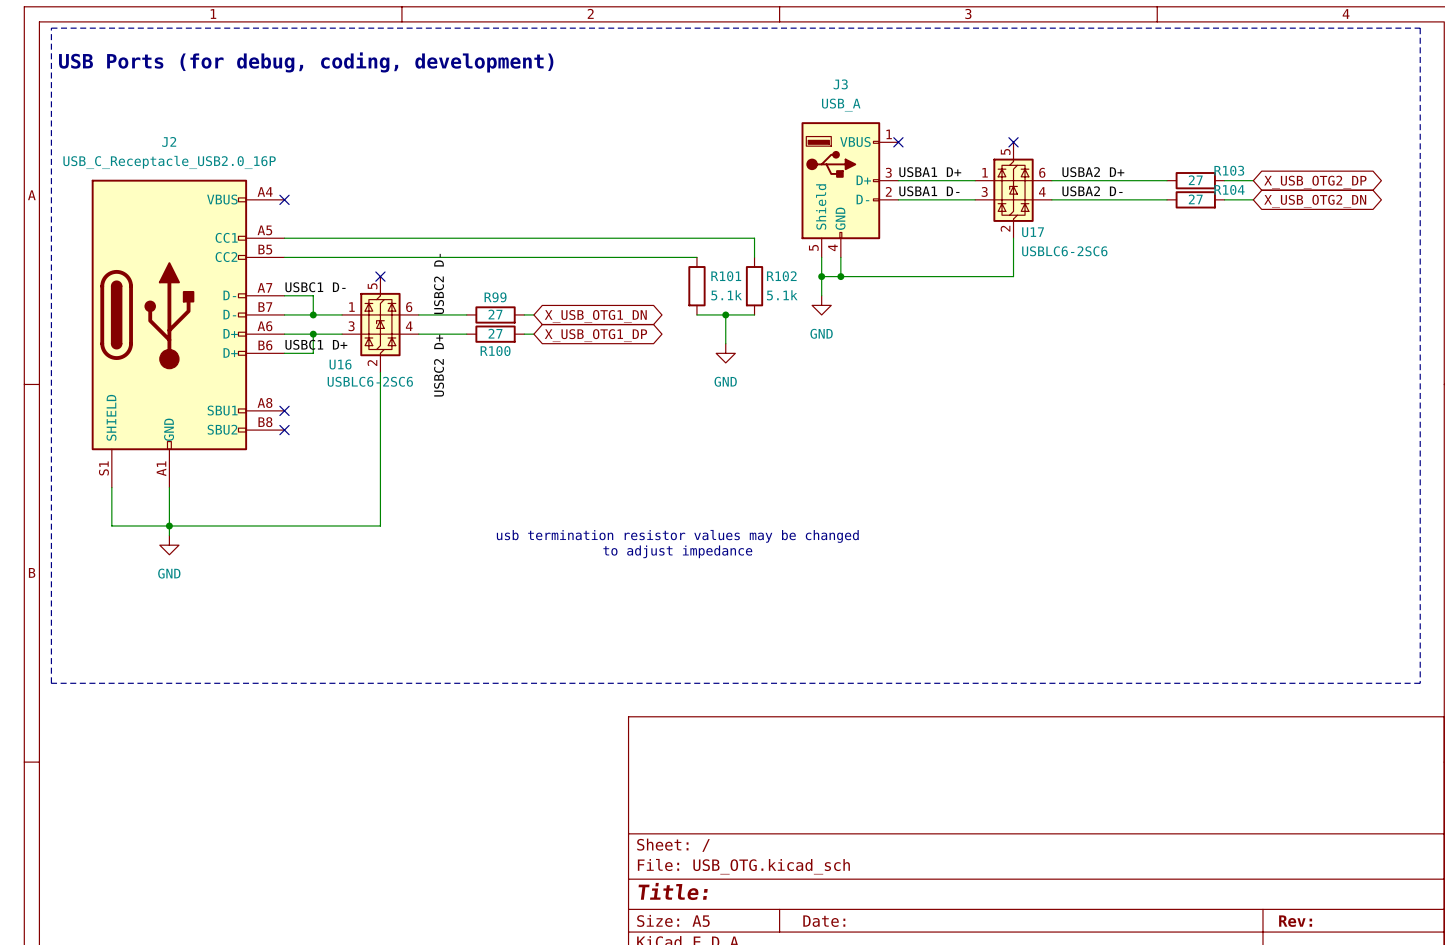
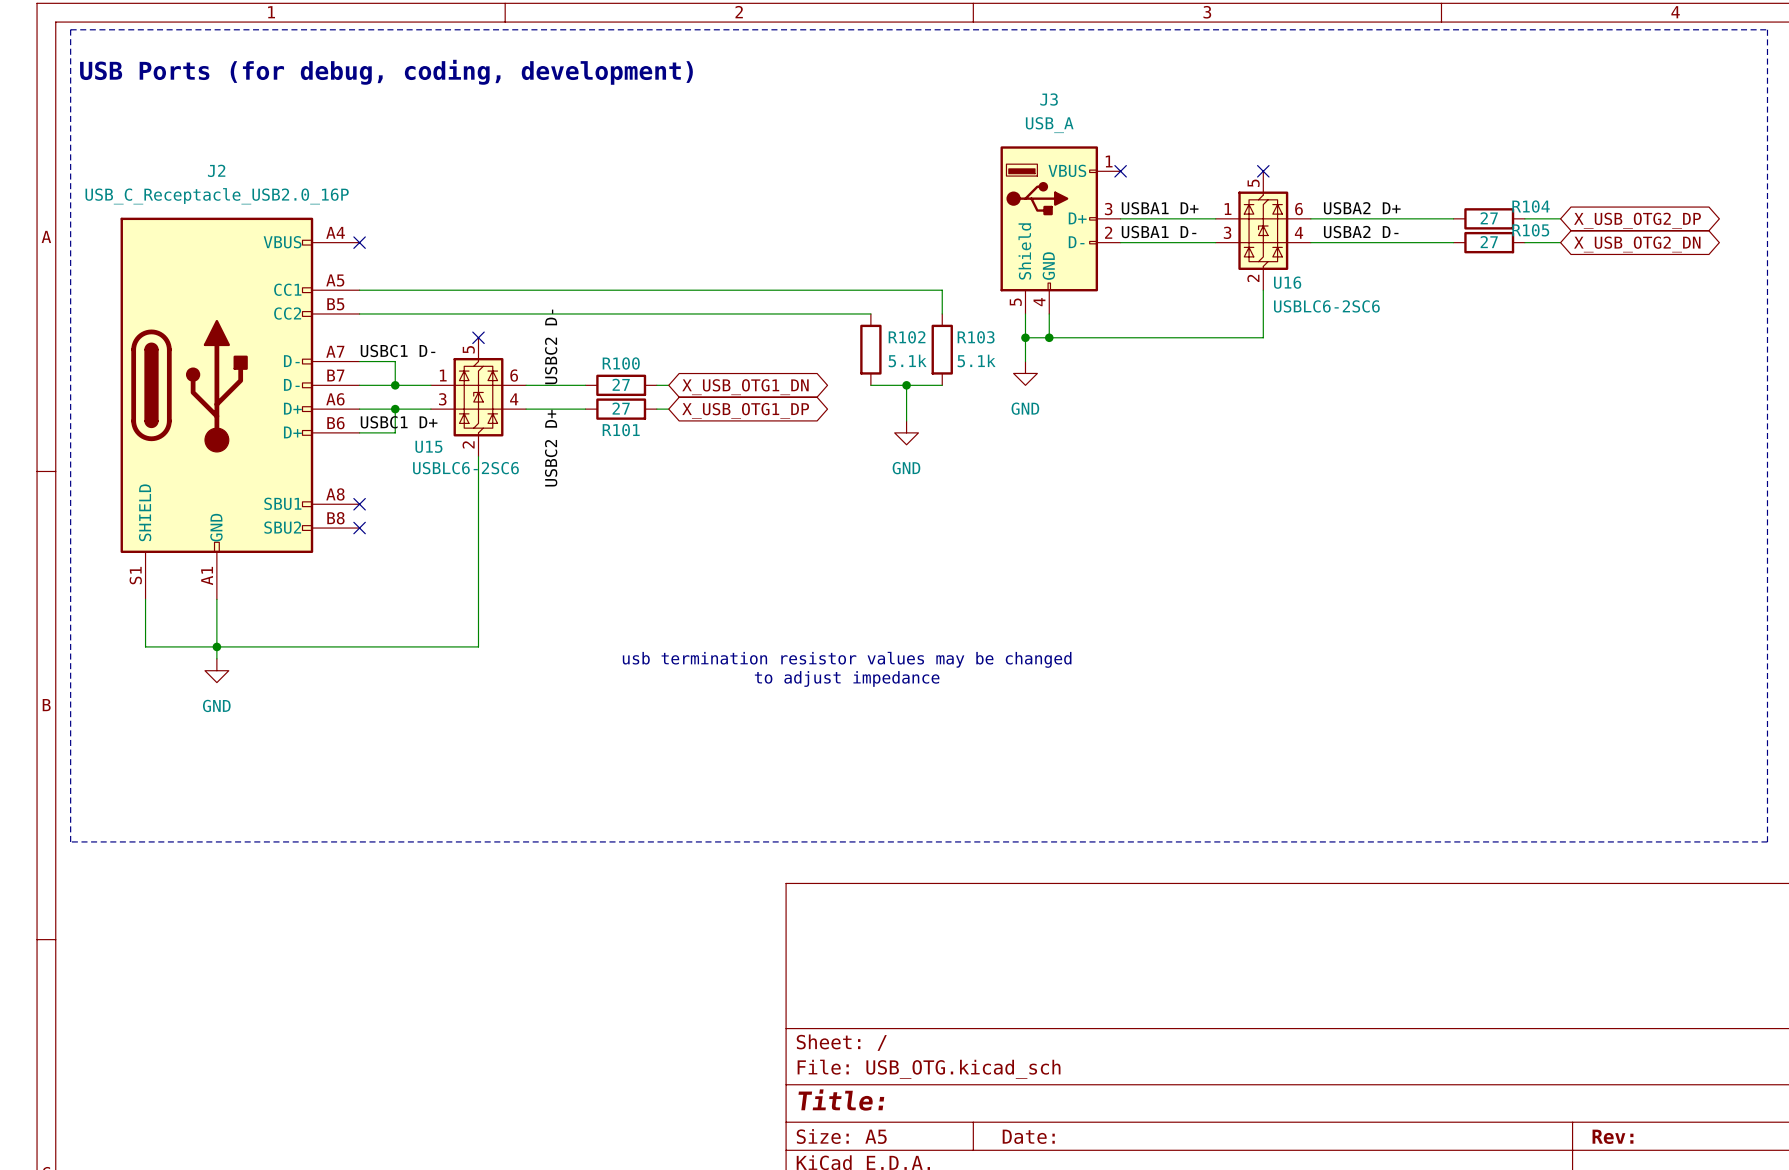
R103 name: R103 (1229, 170) -> R104 (1531, 206)
R104 name: R104 (1229, 189) -> R105 (1530, 230)
U17 name: U17 (1033, 232) -> U16 (1287, 282)
R101 name: R101 (726, 276) -> R102 (907, 337)
R102 name: R102 (781, 276) -> R103 (976, 337)
R99 name: R99 (495, 297) -> R100 (621, 363)
R100 name: R100 (495, 351) -> R101 (621, 430)
U16 name: U16 (340, 364) -> U15 (428, 446)

